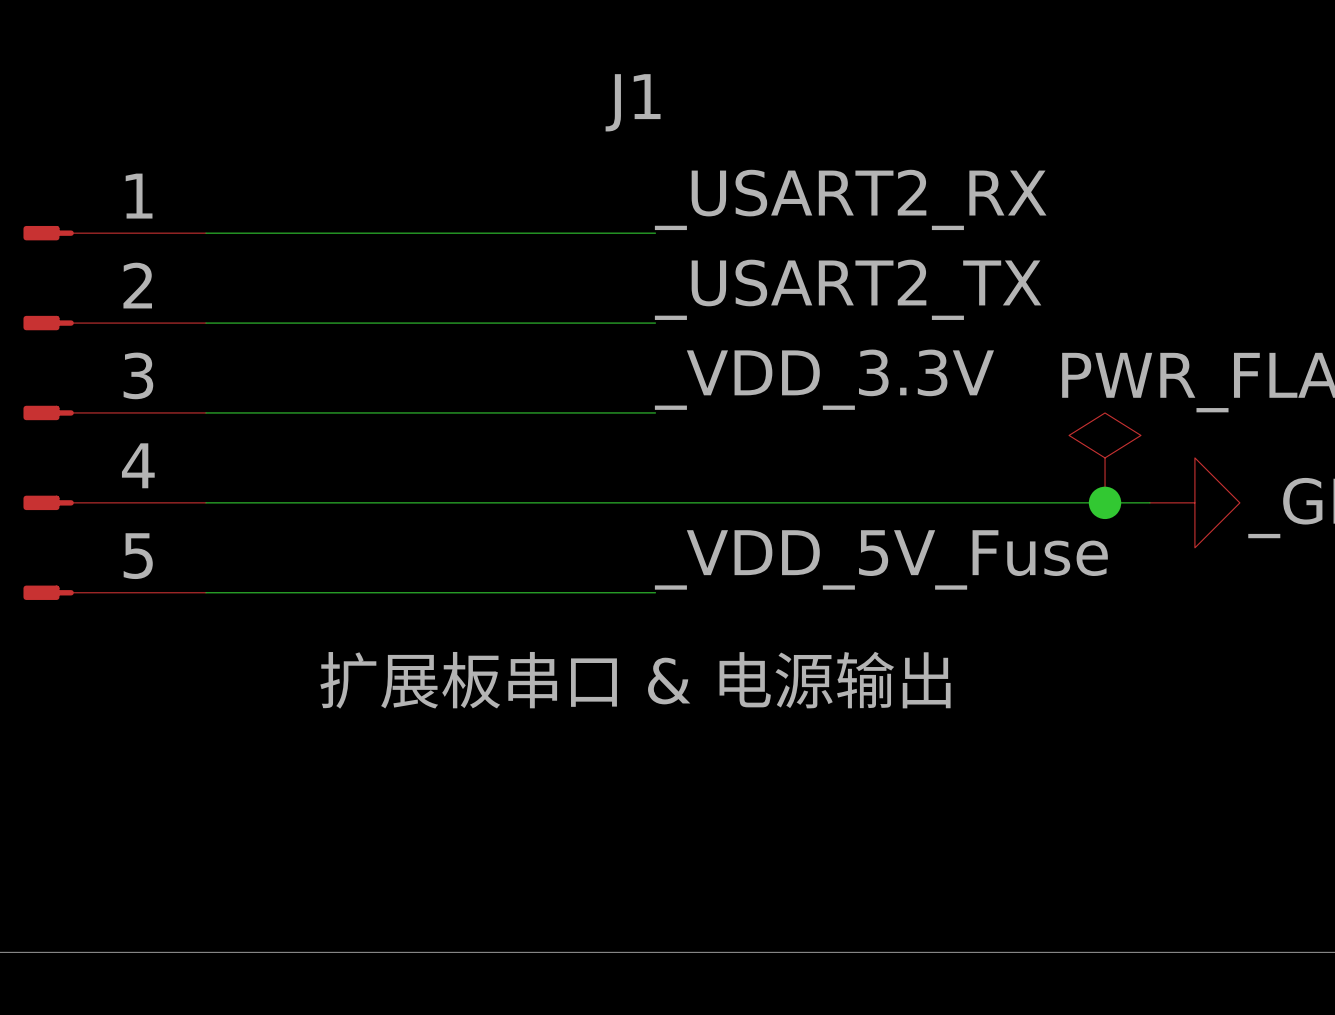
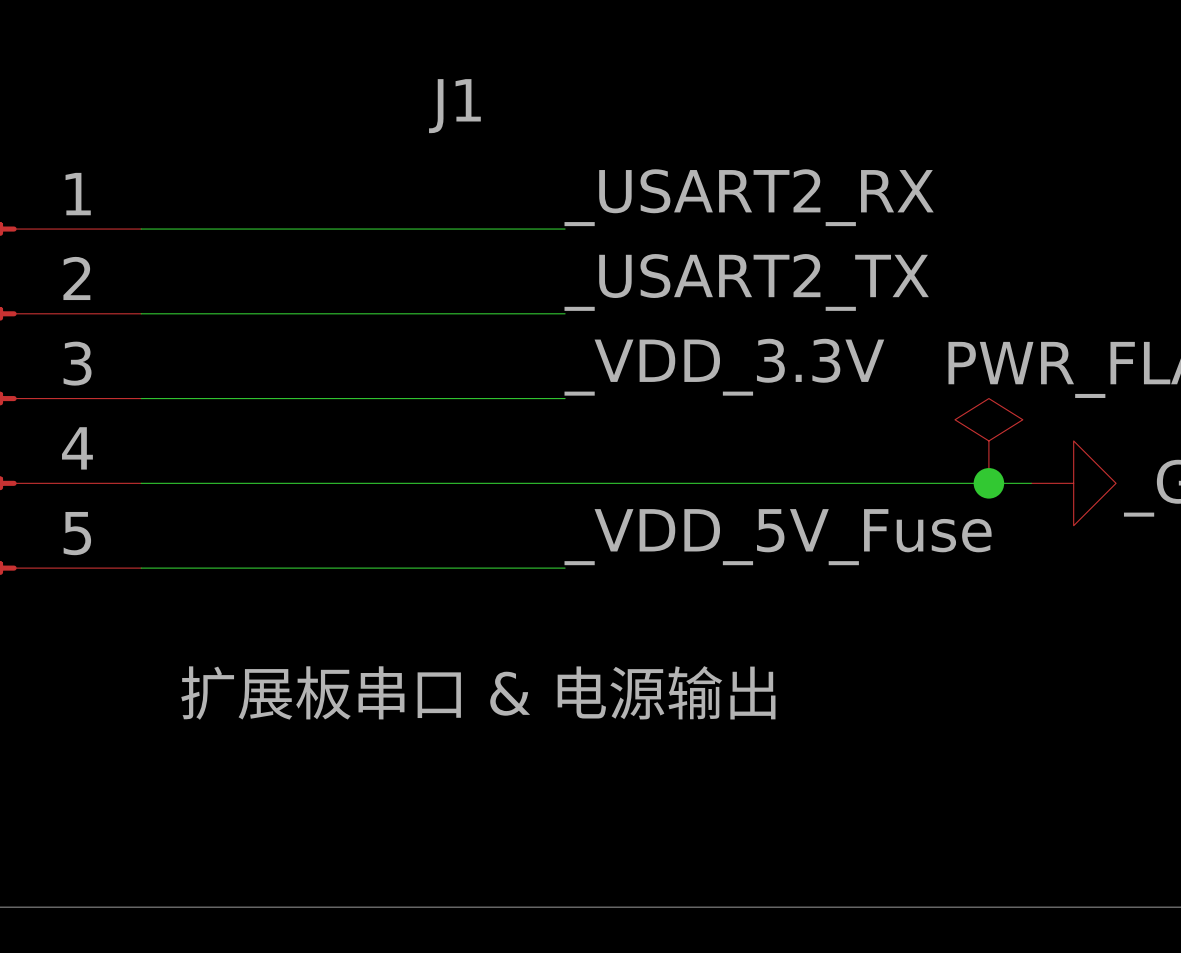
J1 name position: J1 (633, 102) -> J1 (454, 106)
J1 value position: 扩展板串口 & 电源输出 (635, 680) -> 扩展板串口 & 电源输出 (478, 692)

